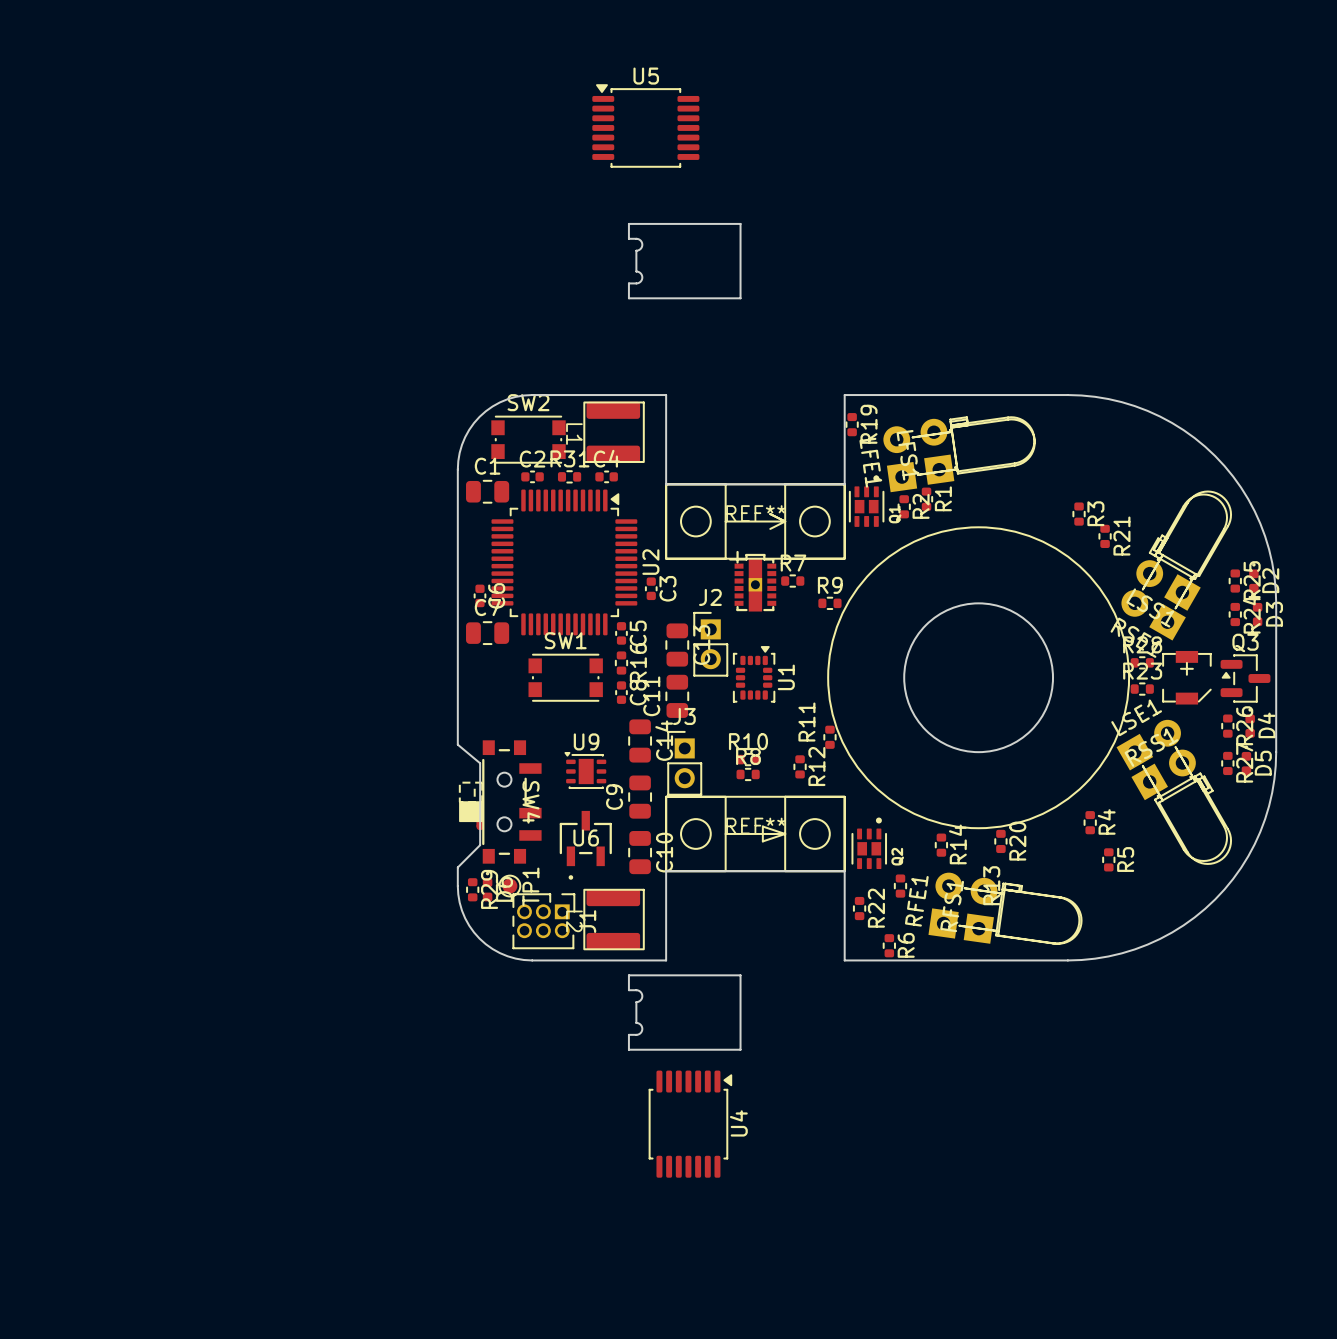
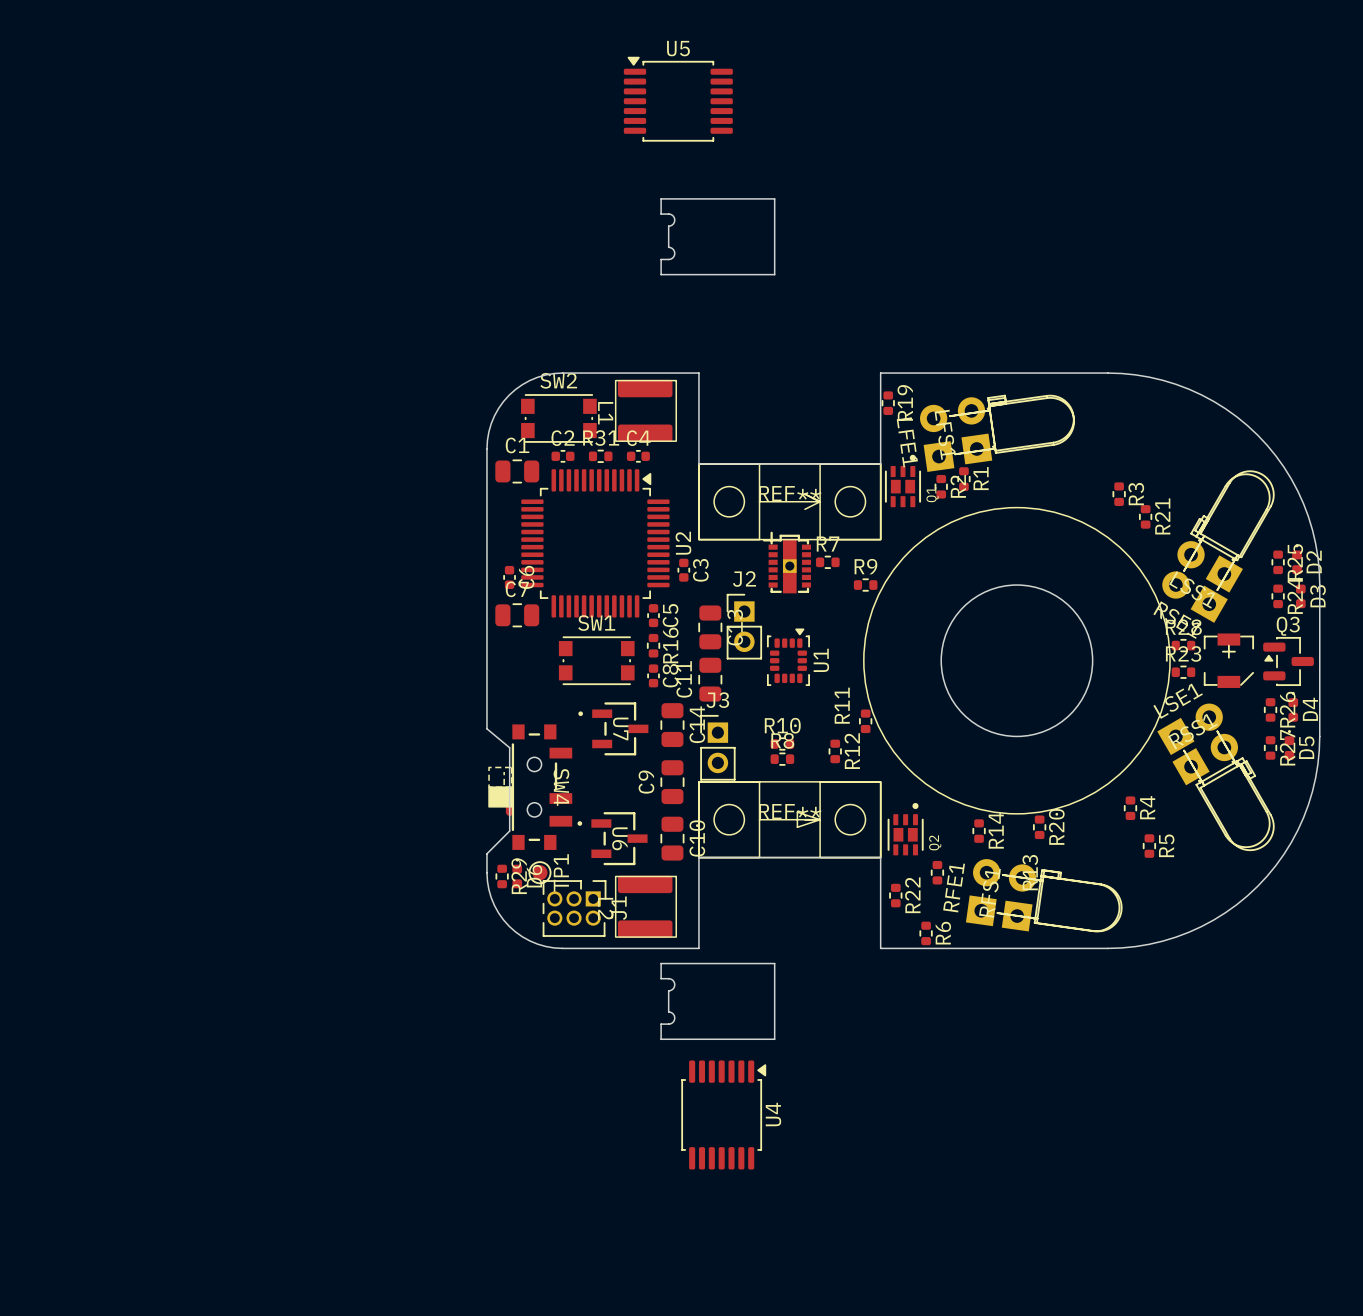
U7: none -> (613, 728)
U9: (585, 770) -> none
U6 rotation: 0° (585, 845) -> 90° clockwise (612, 838)

